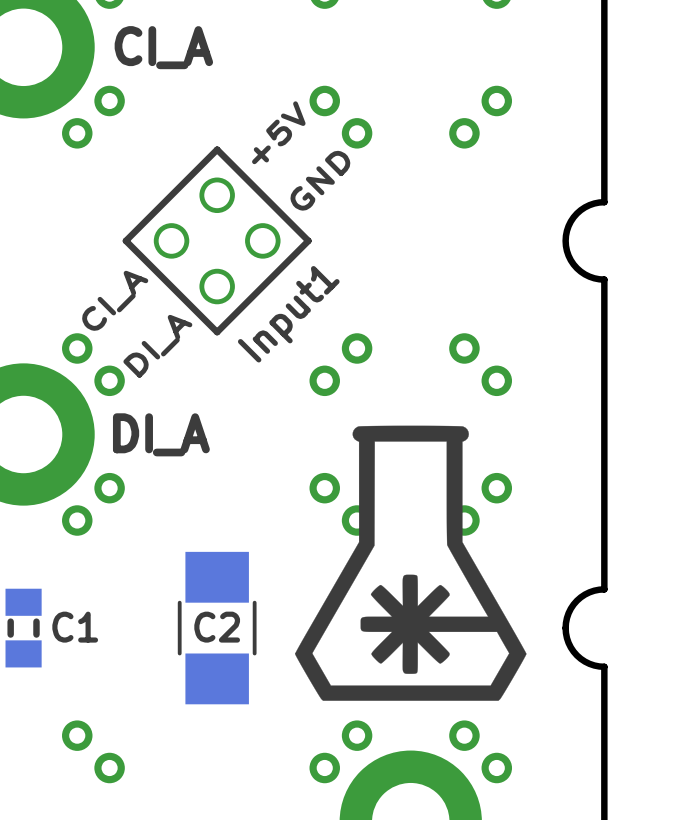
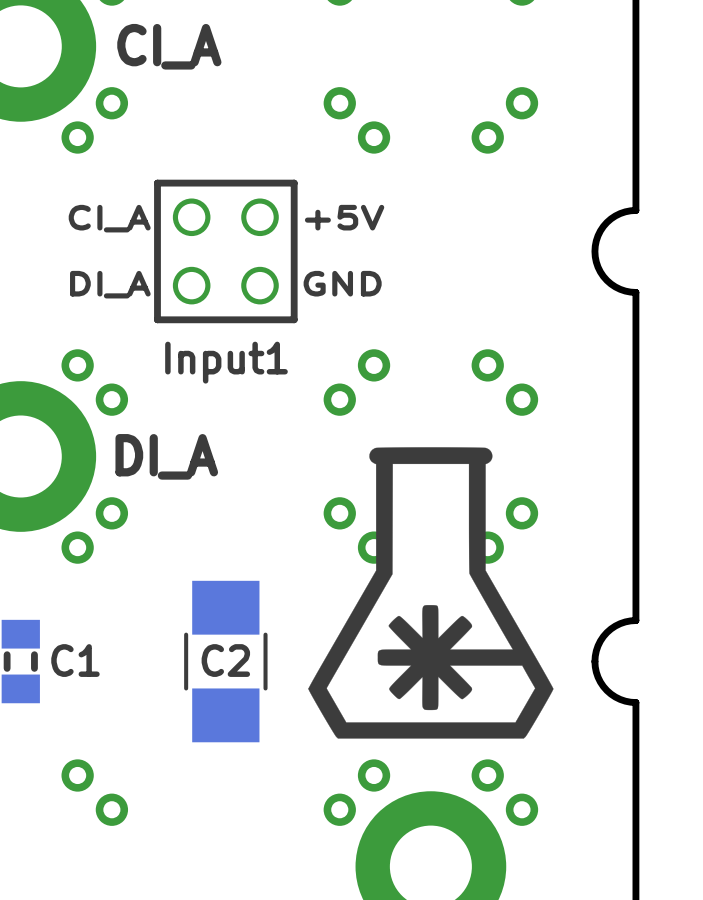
text: +5V (278, 132) -> none
text: GND (320, 180) -> +5V (344, 217)
text: none -> CI_A (109, 218)
part rotation: 0° (217, 240) -> 45° clockwise (225, 251)
text: none -> GND (342, 283)
text: CI_A (115, 300) -> DI_A (110, 284)
text: DI_A (157, 346) -> none

